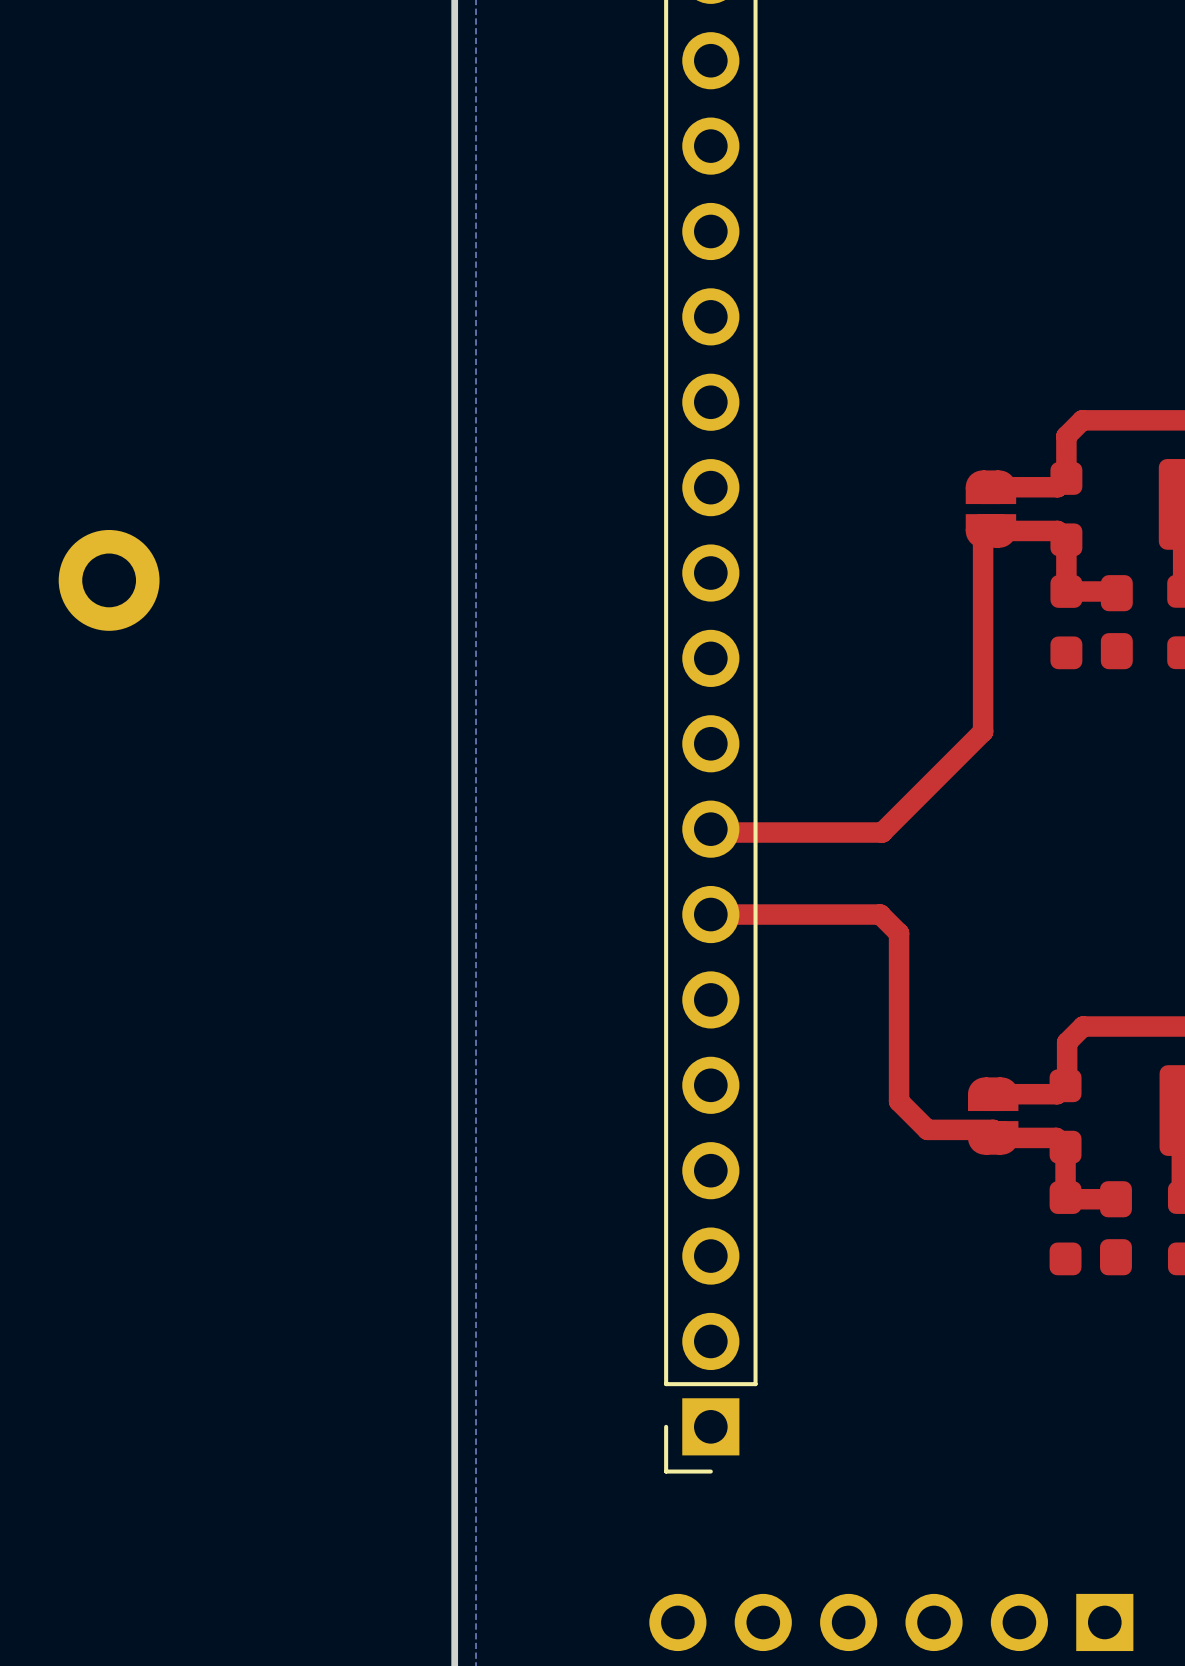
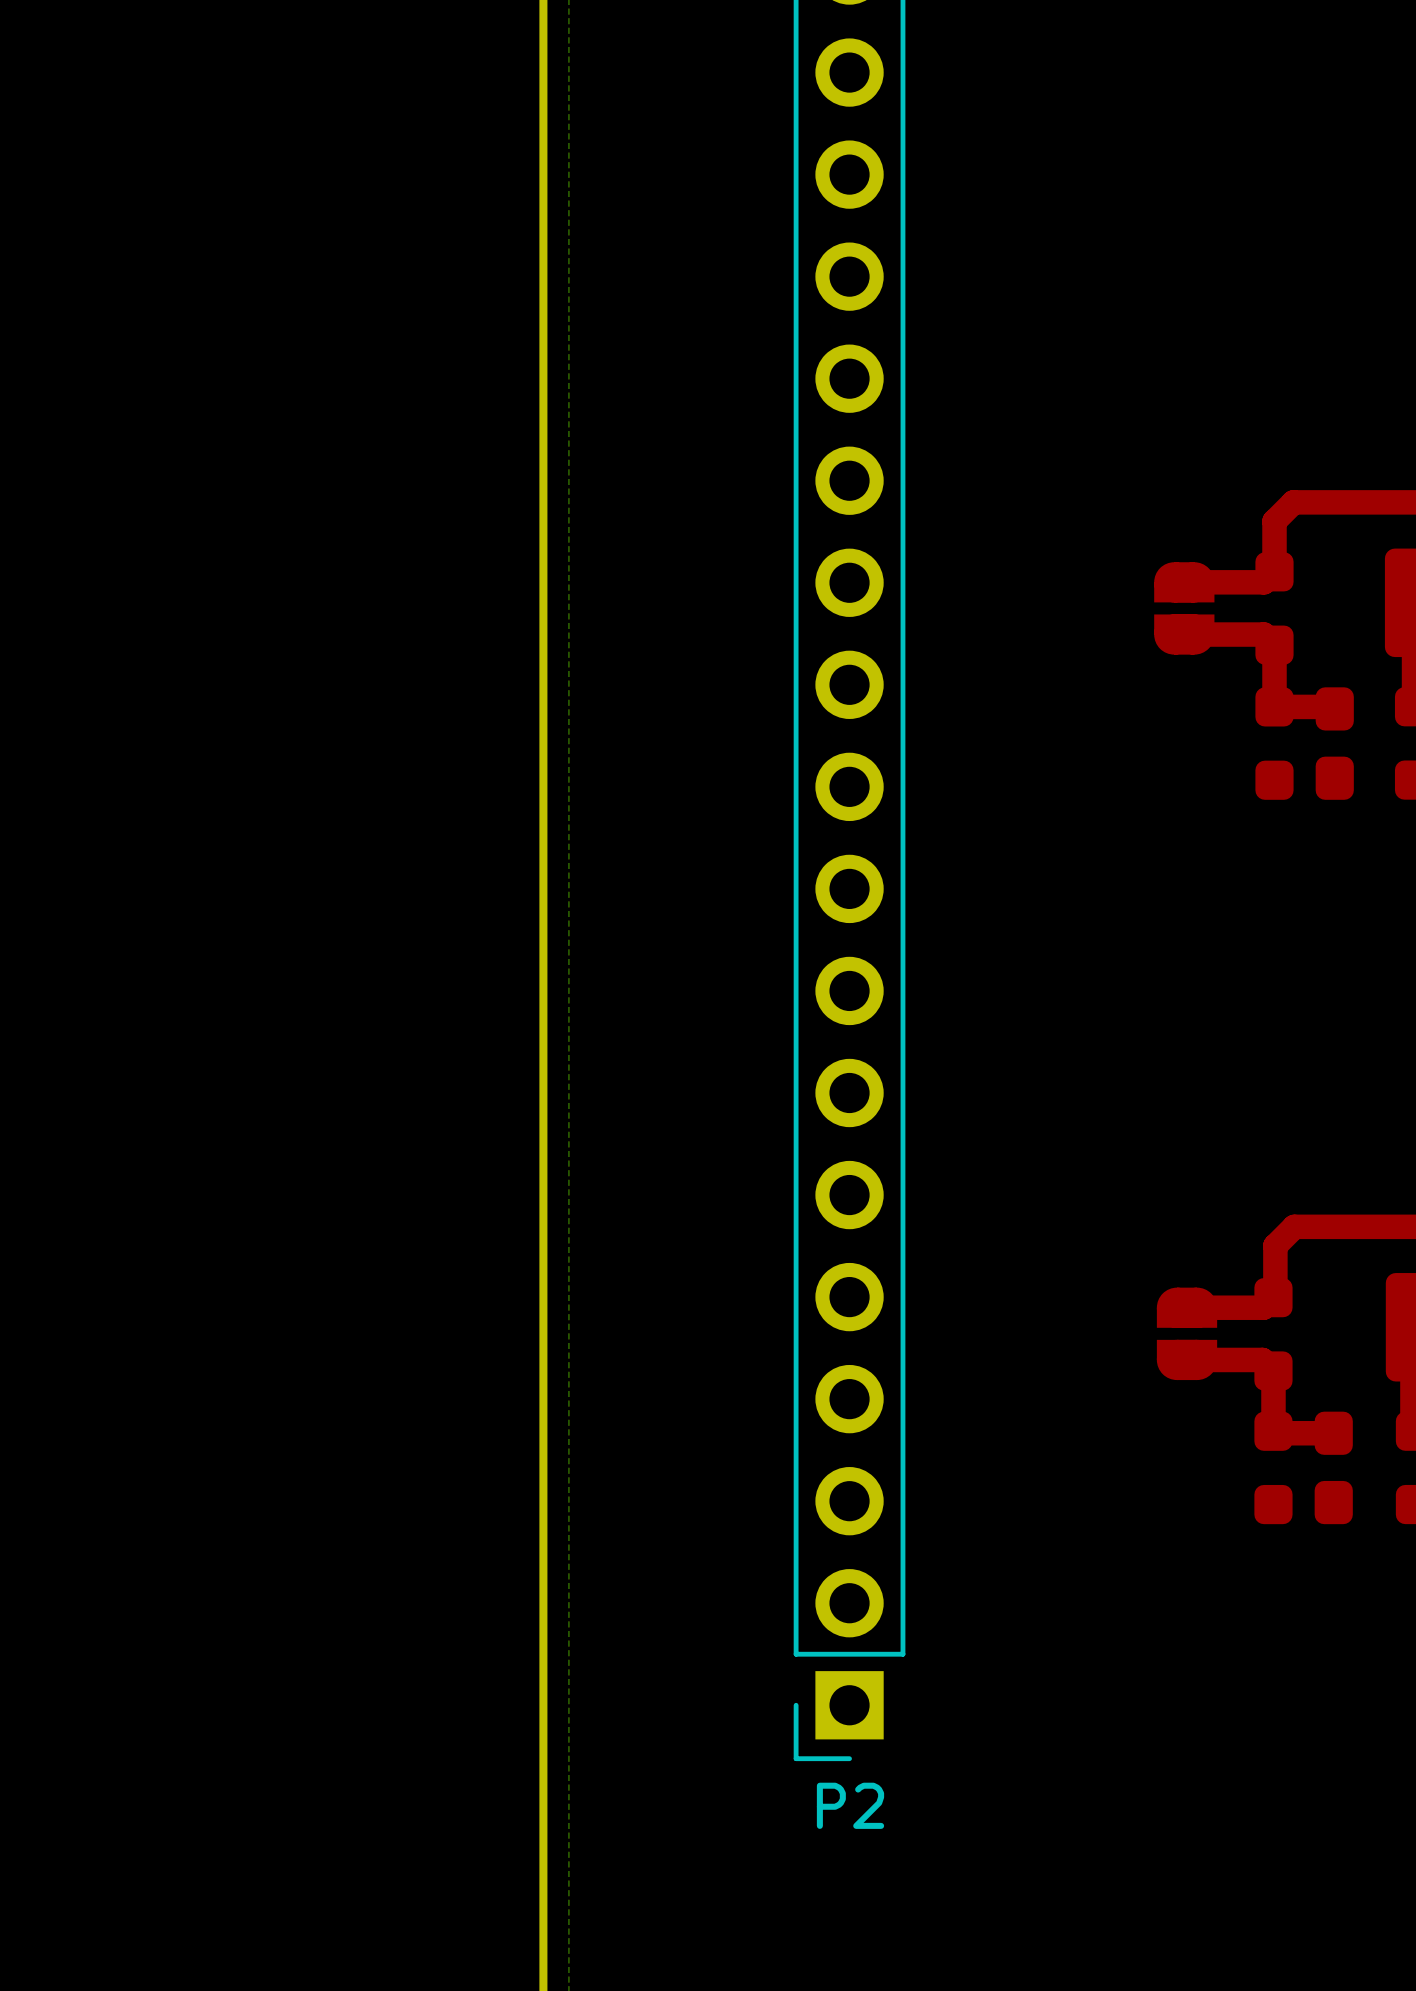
top track: (990, 530) (983, 538) (983, 731) (882, 832) (714, 832) (710, 829) -> none
part: (109, 580) -> none
top track: (710, 914) (880, 914) (899, 933) (899, 1101) (927, 1129) (993, 1129) (993, 1137) -> none
P2 name: none -> P2 (850, 1805)
part: (891, 1622) -> none

